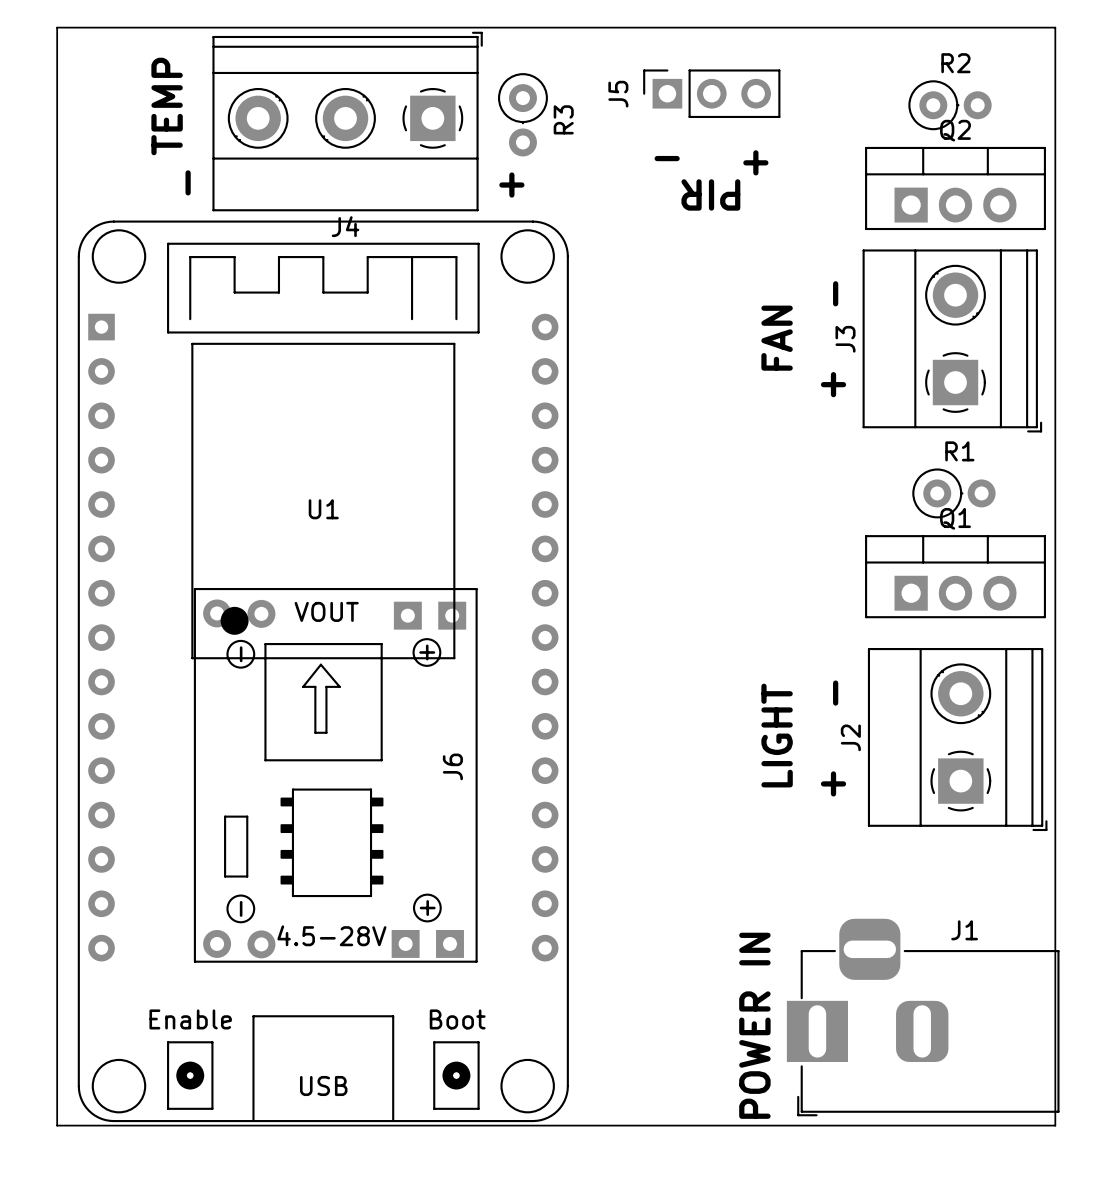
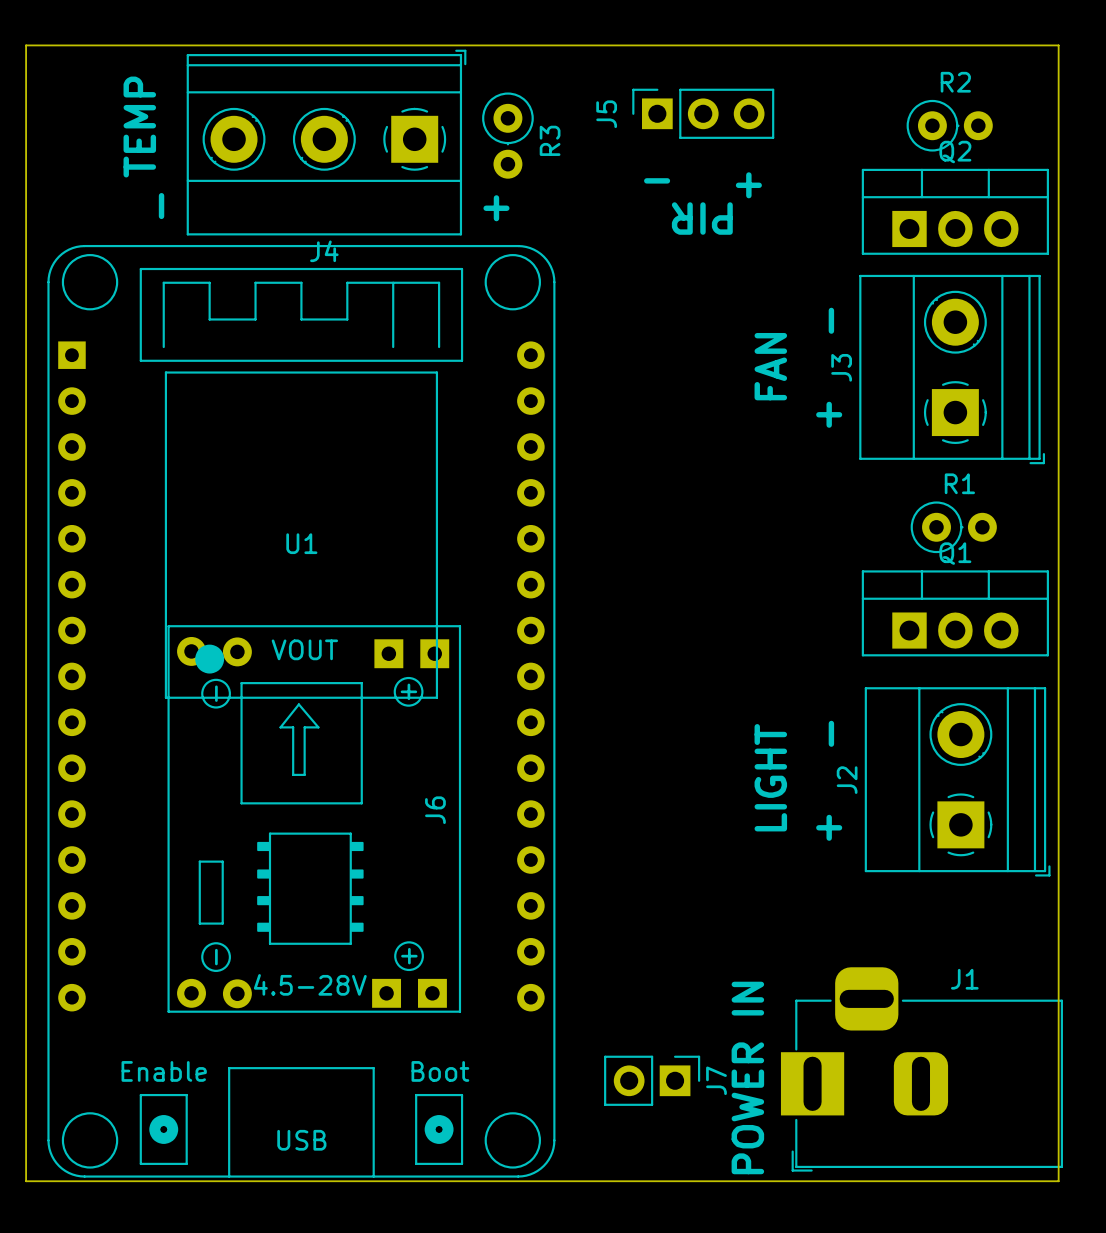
J7: none -> (652, 1080)

